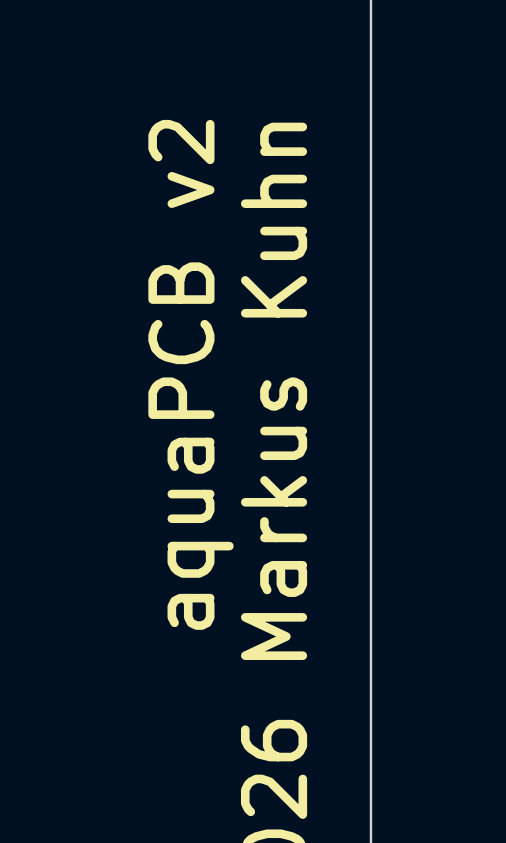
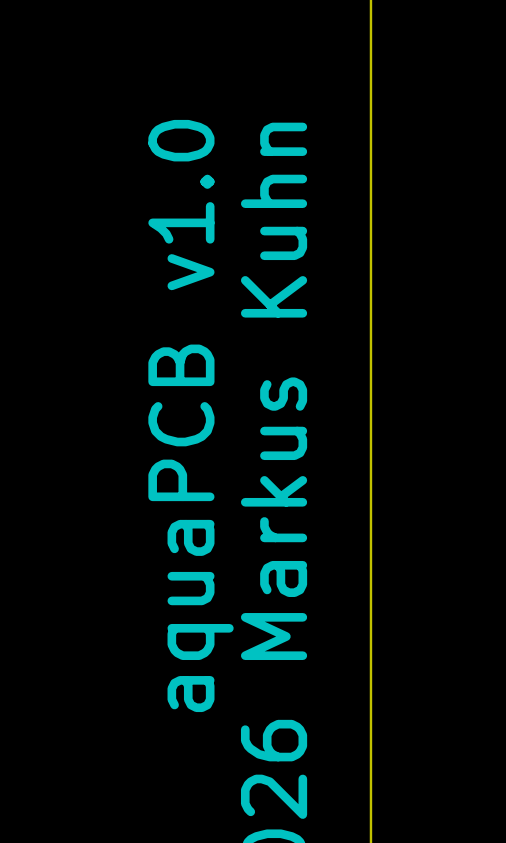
text: aquaPCB v2 (191, 374) -> aquaPCB v1.0 (191, 415)

